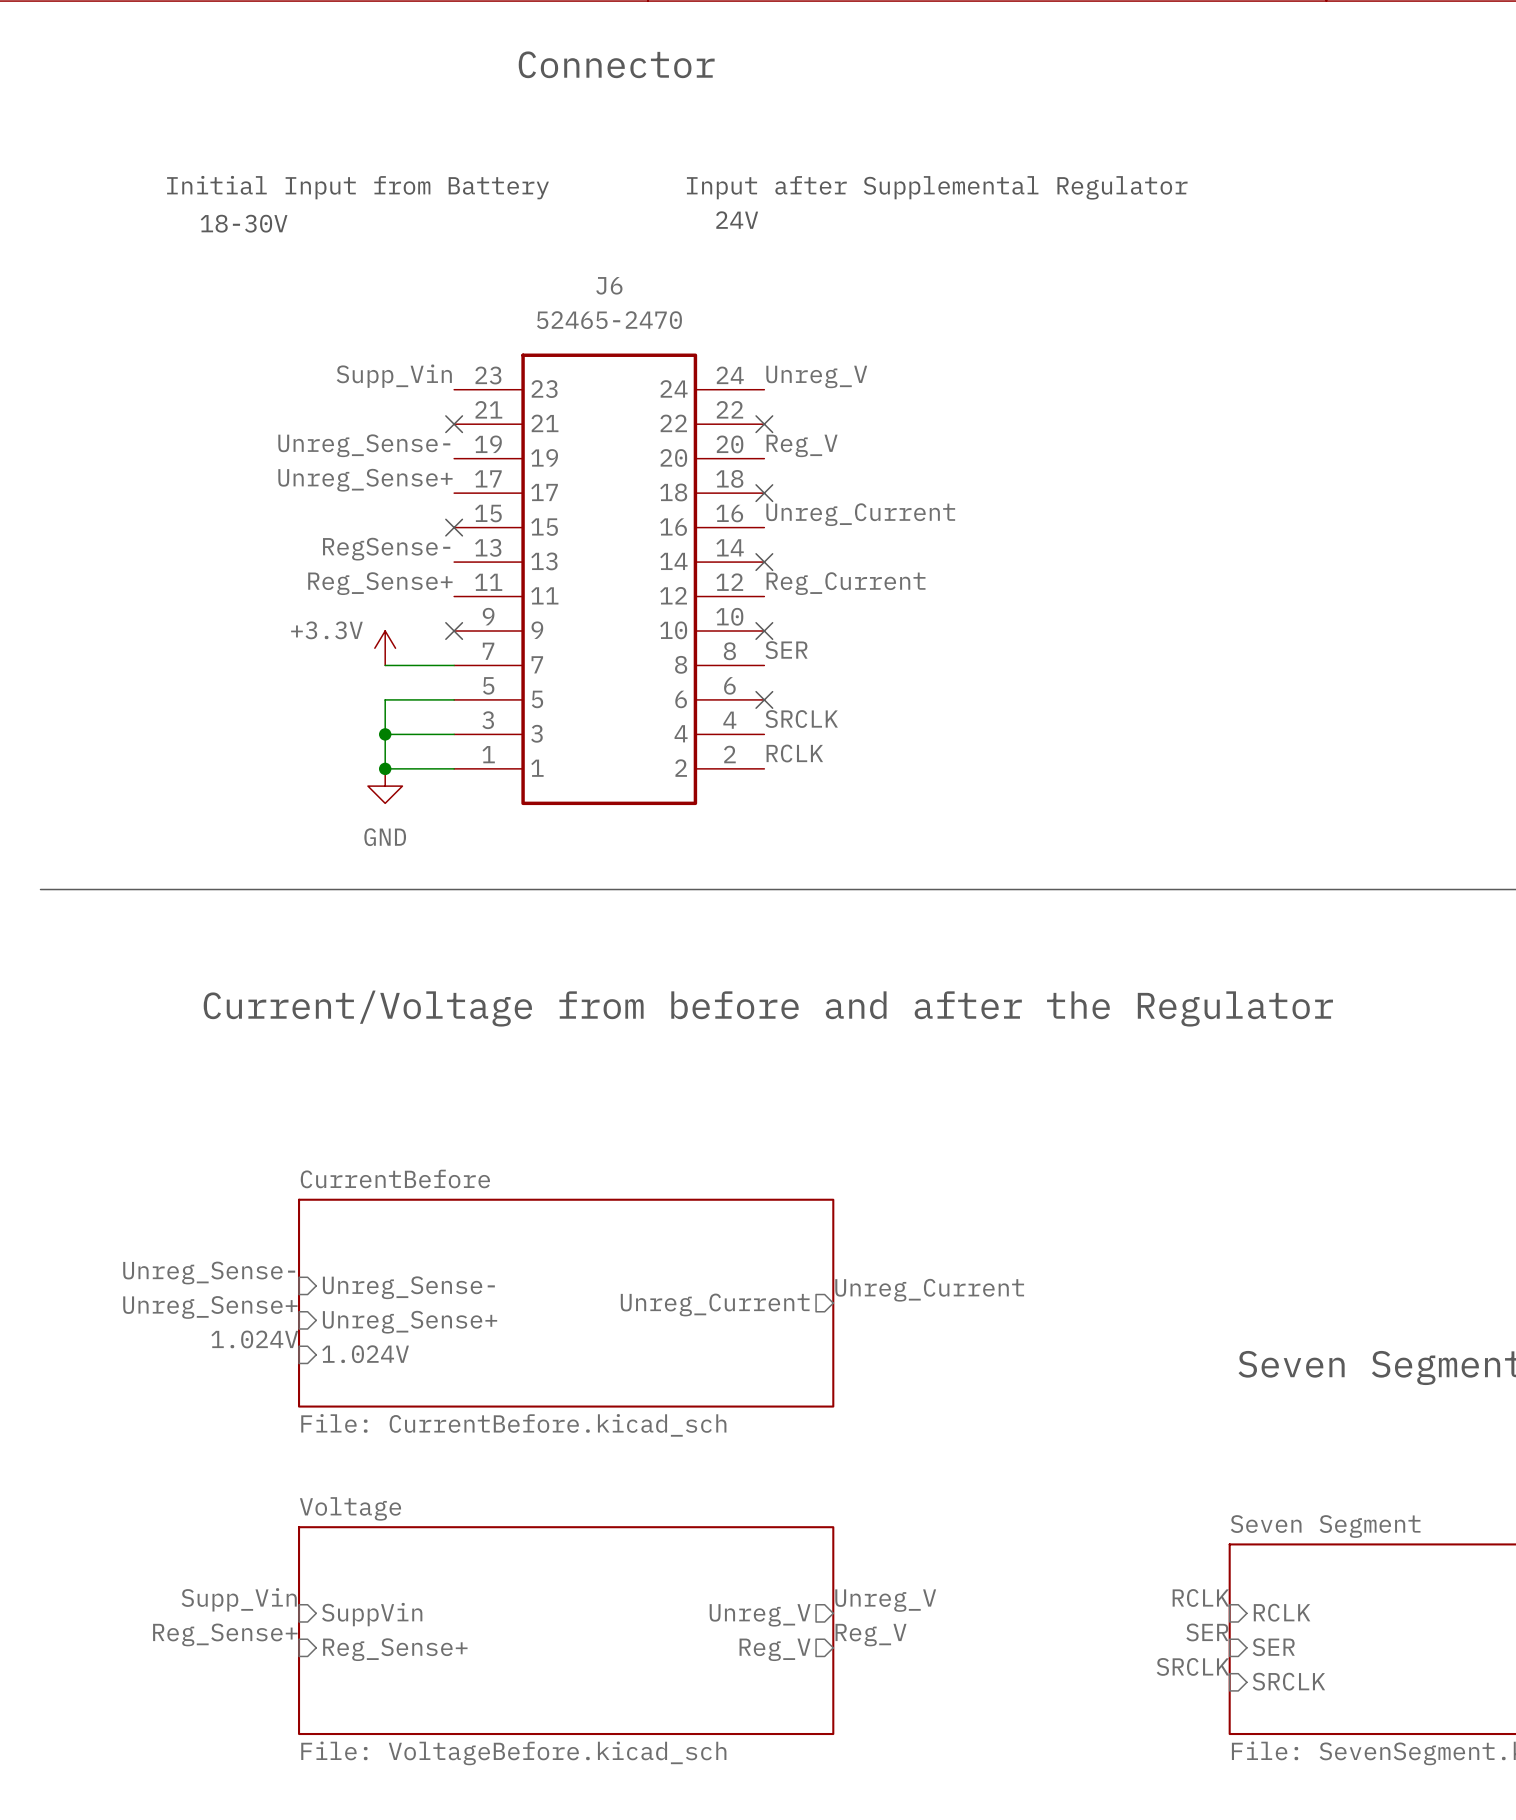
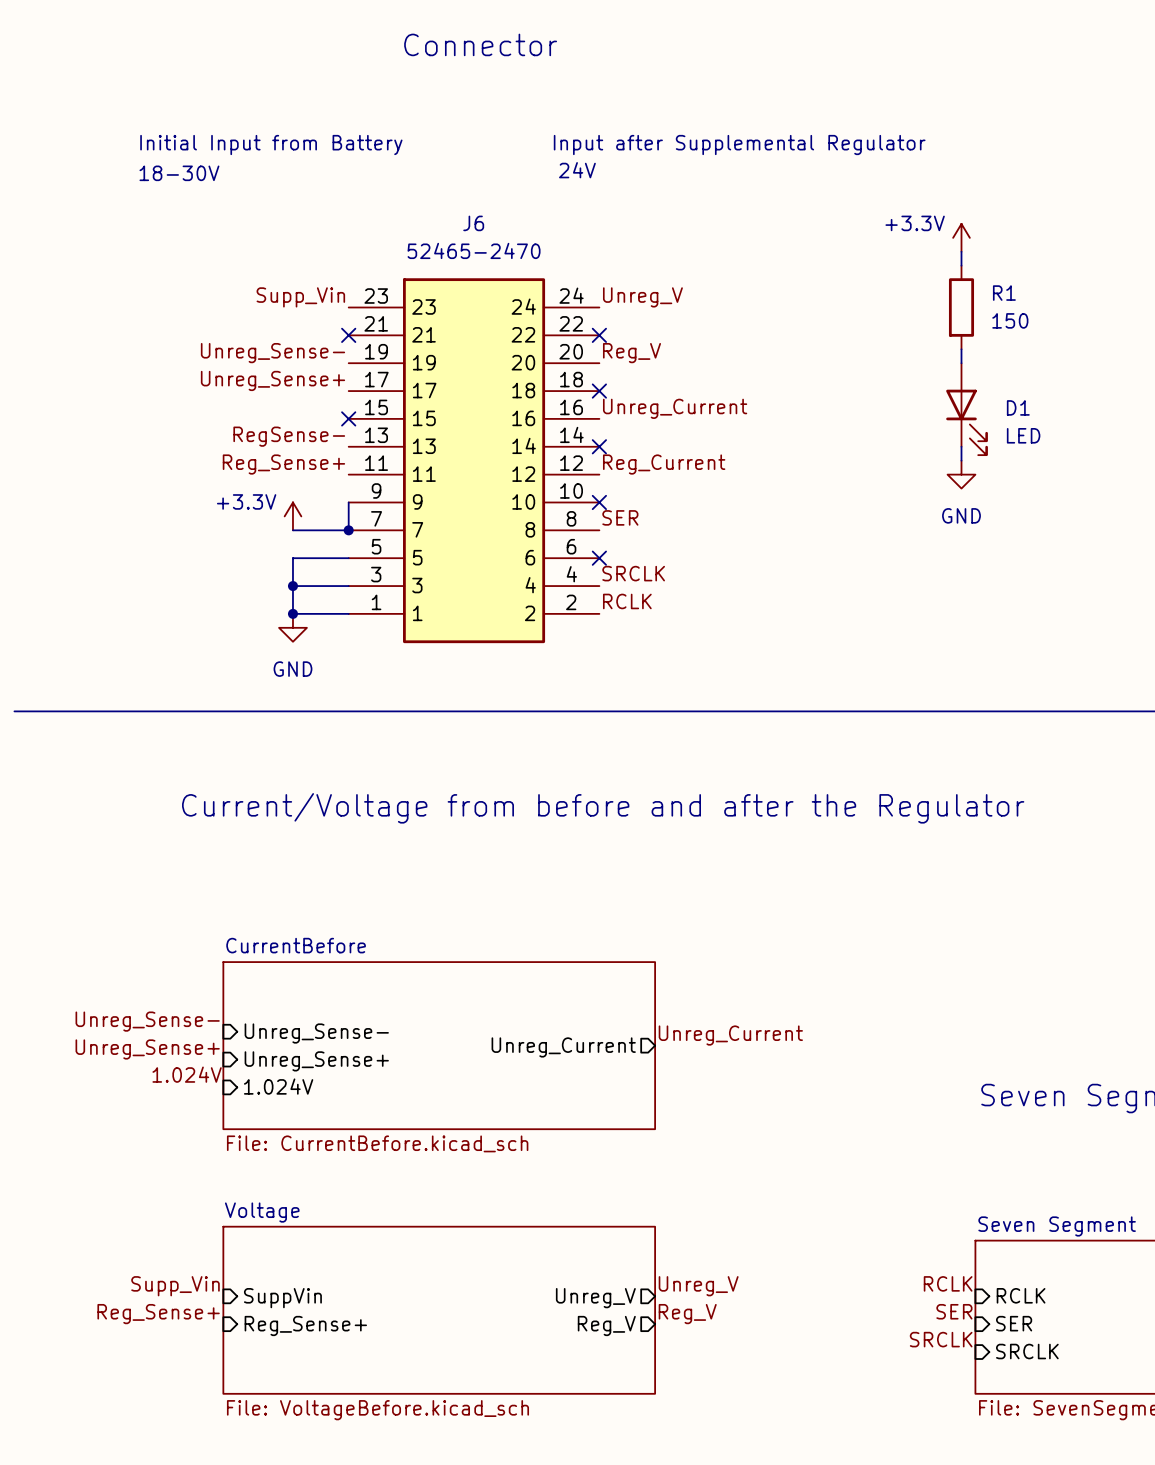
power symbol: none -> +3.3V (961, 237)
wire: none -> (961, 251) (961, 265)
R1: none -> 150 (961, 307)
wire: none -> (961, 349) (961, 363)
D1: none -> LED (966, 409)
wire: none -> (961, 446) (961, 460)
power symbol: none -> GND (961, 474)
wire: none -> (348, 502) (348, 530)
no-connect mark: (454, 631) -> none
junction: none -> (348, 530)

